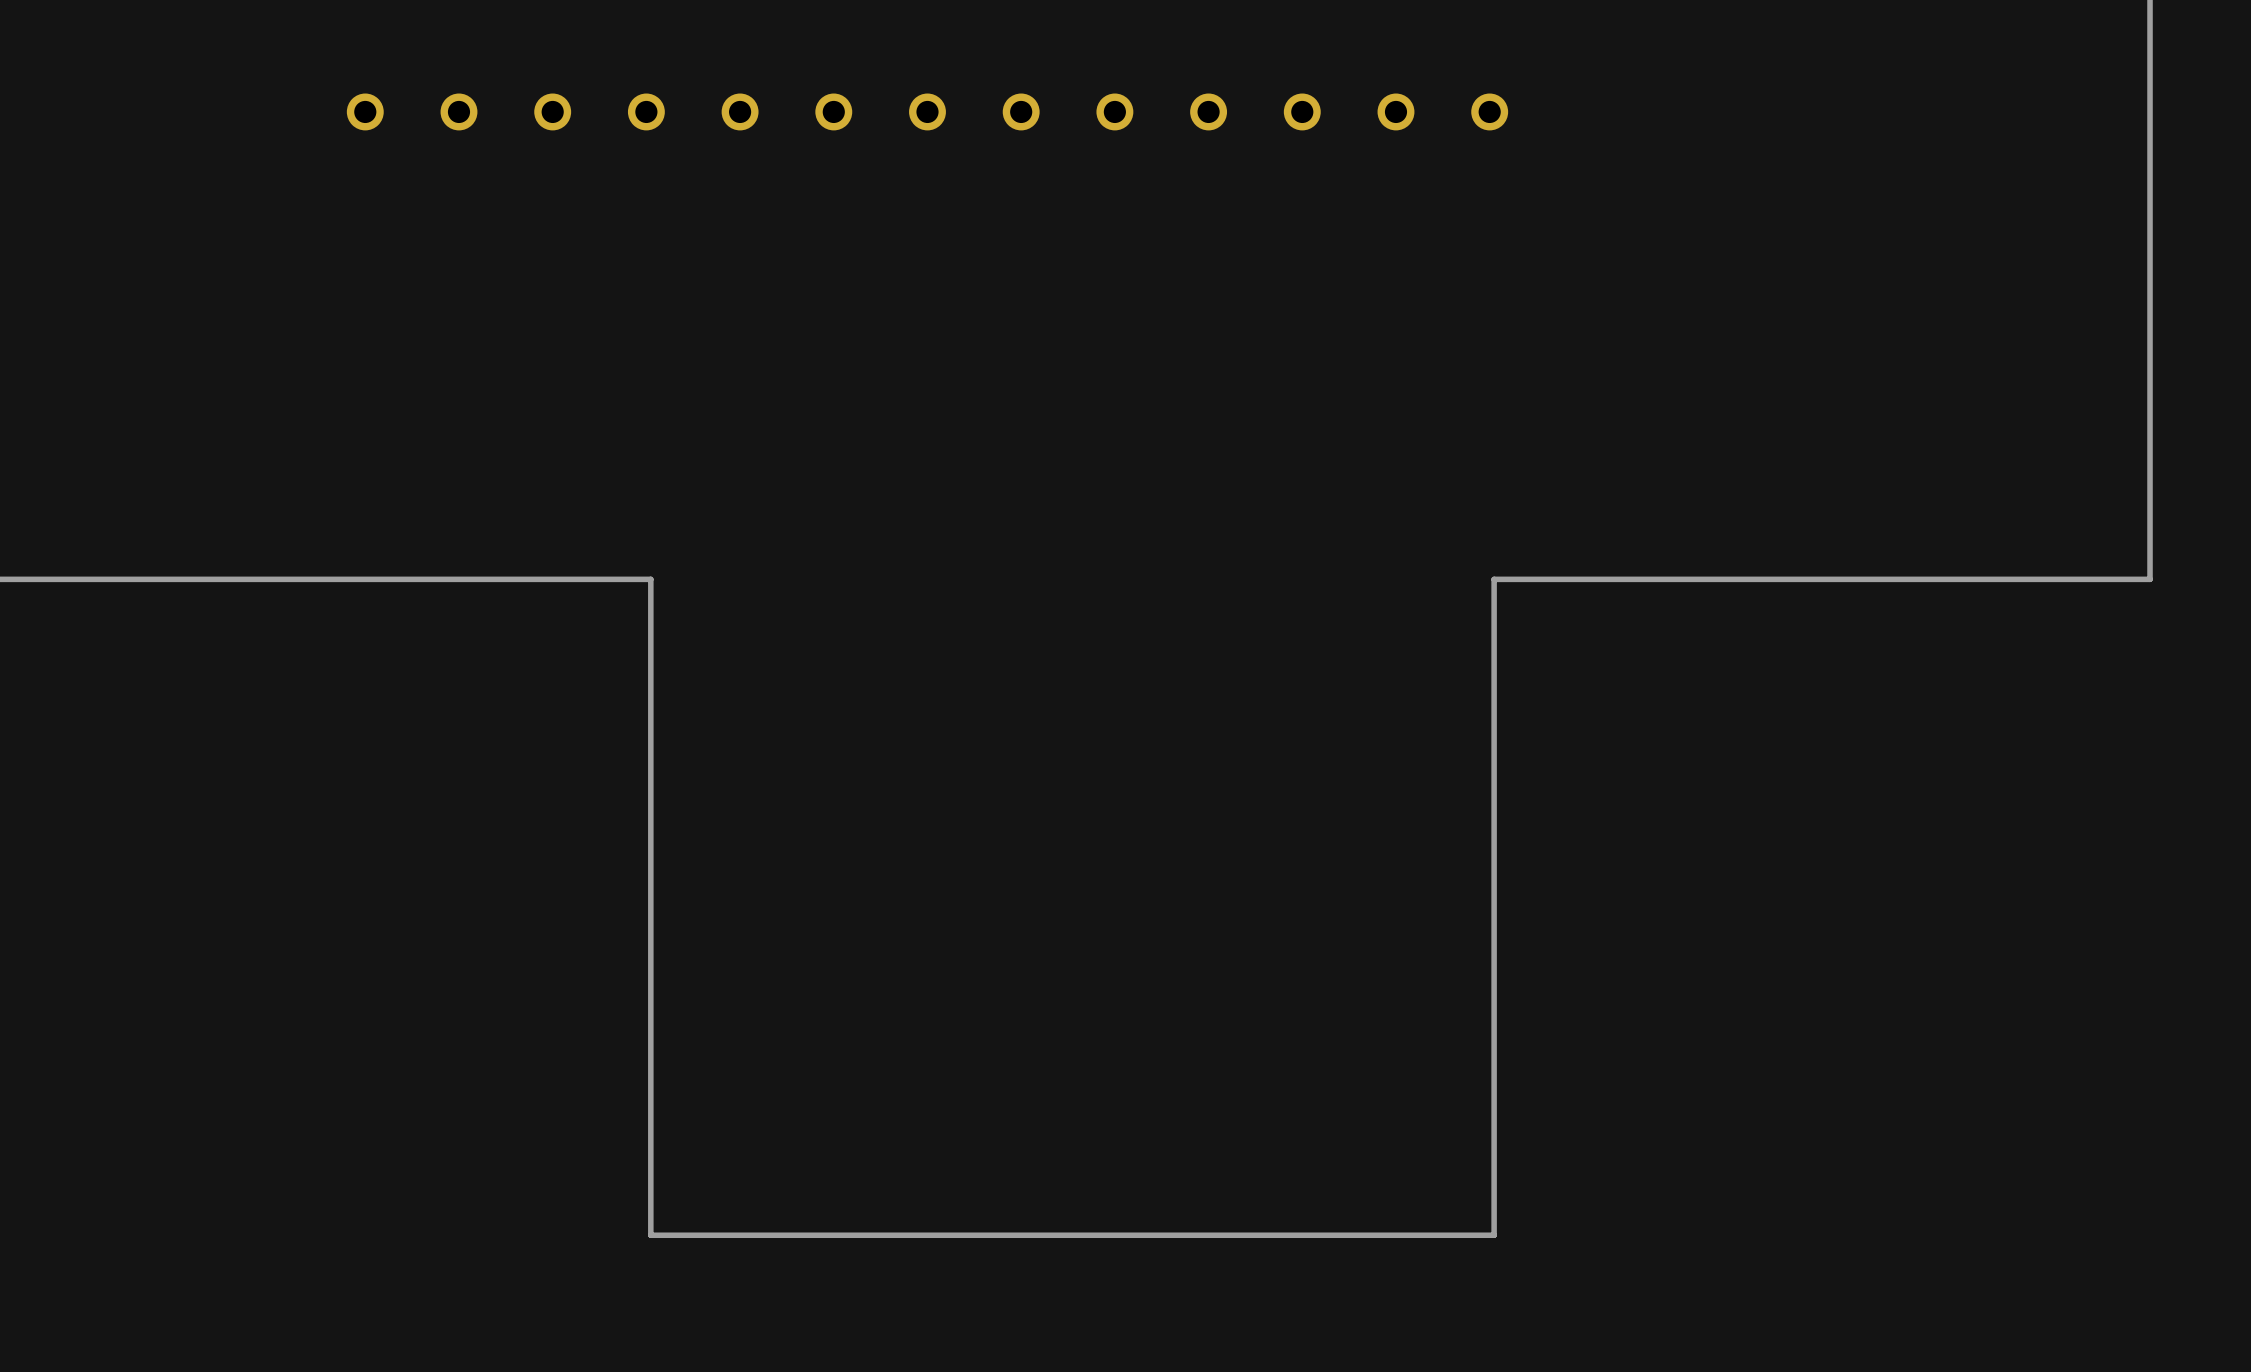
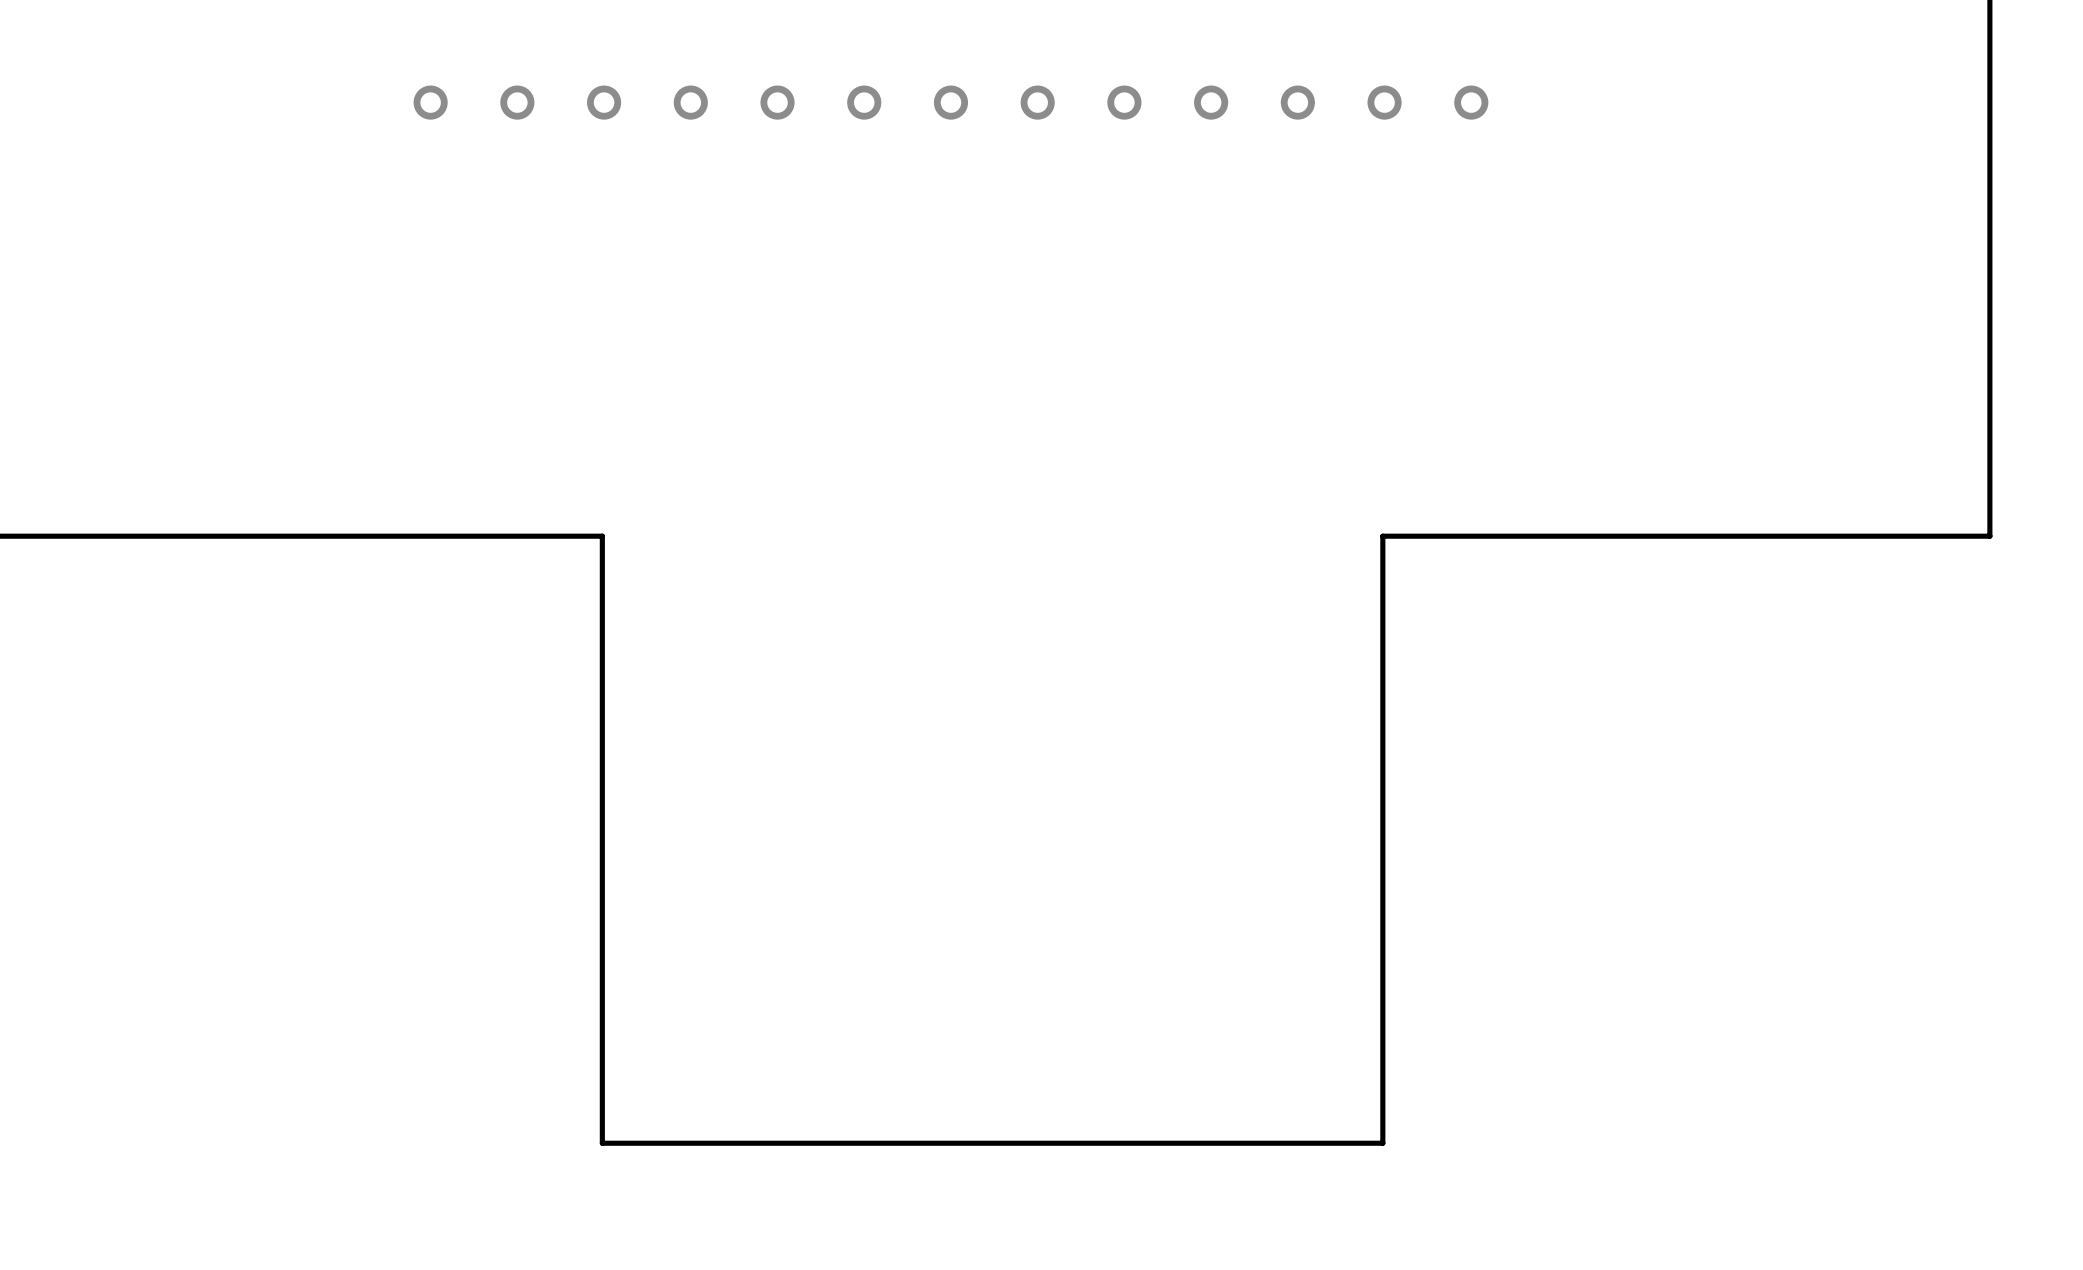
part position: (927, 111) -> (950, 102)

